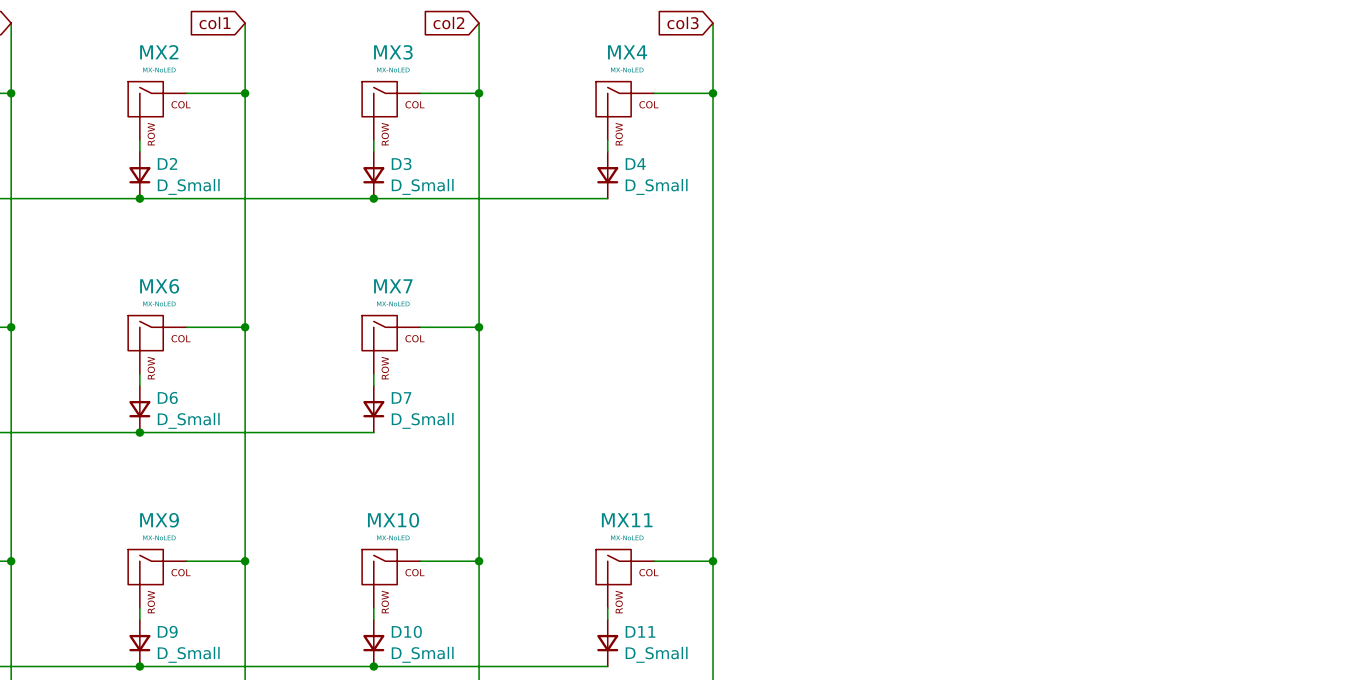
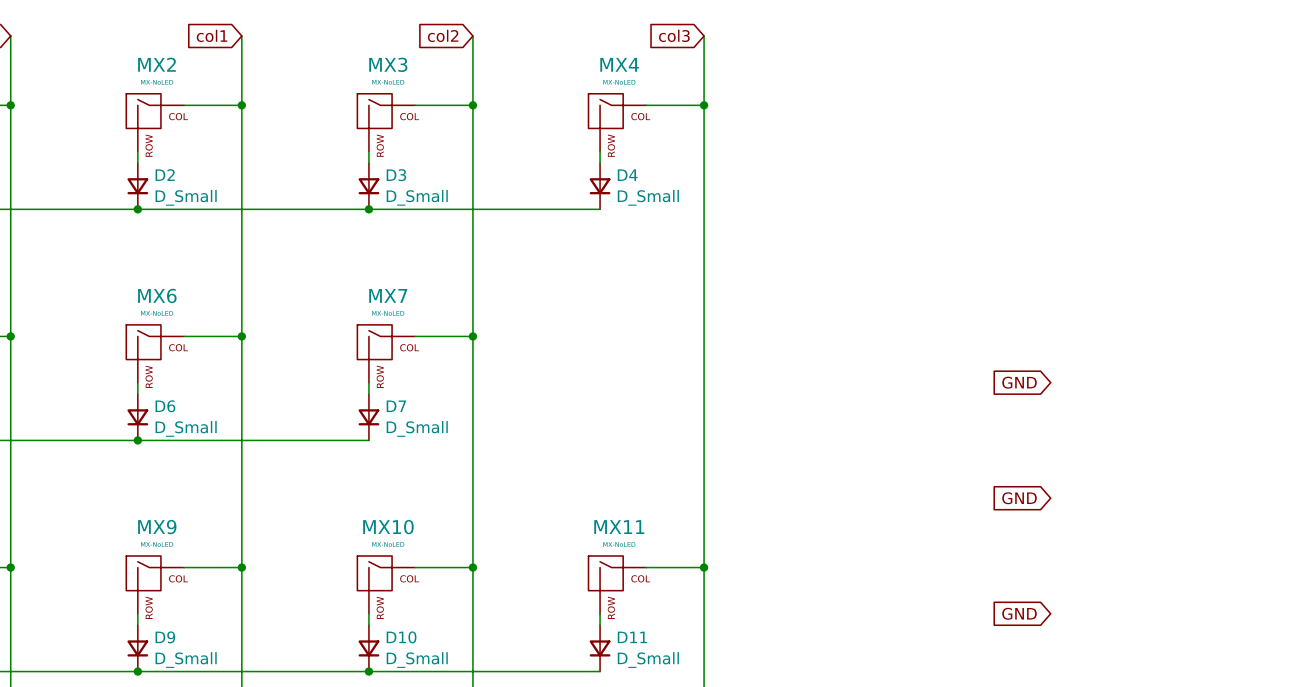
global label: none -> GND (1019, 382)
global label: none -> GND (1019, 498)
global label: none -> GND (1019, 613)

